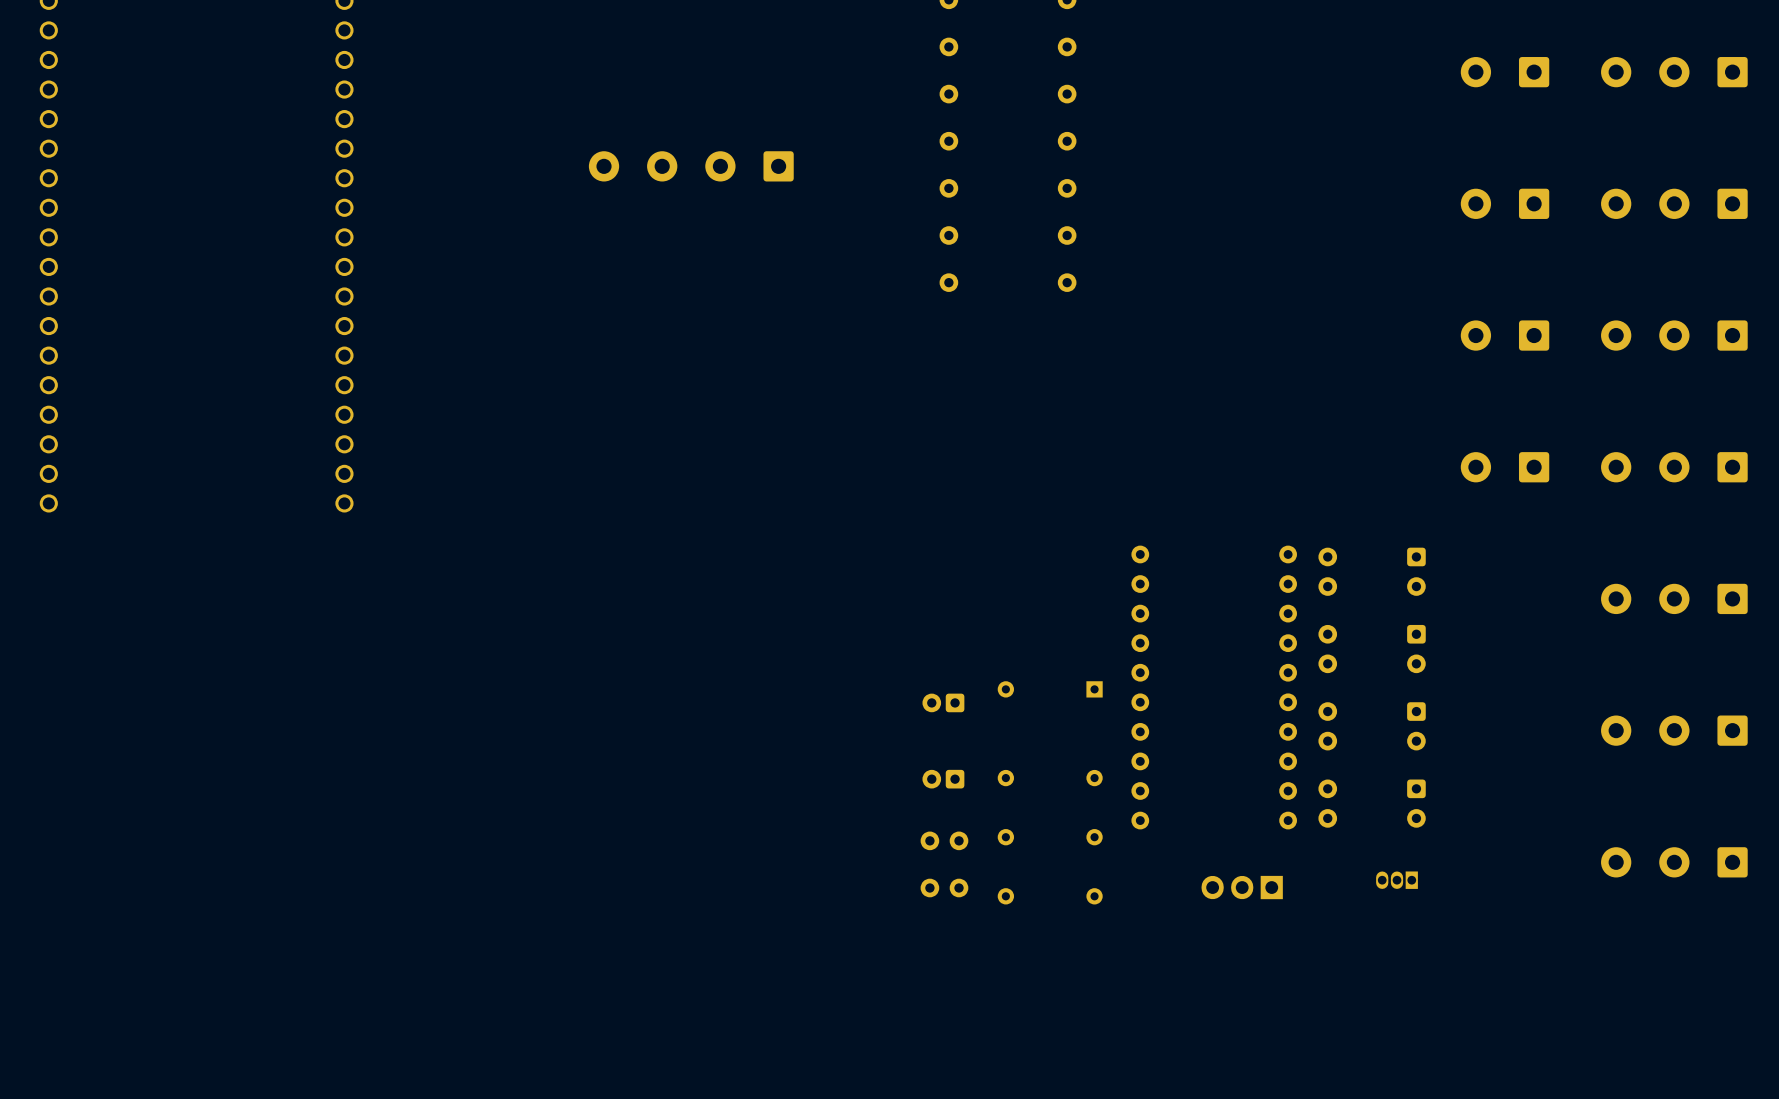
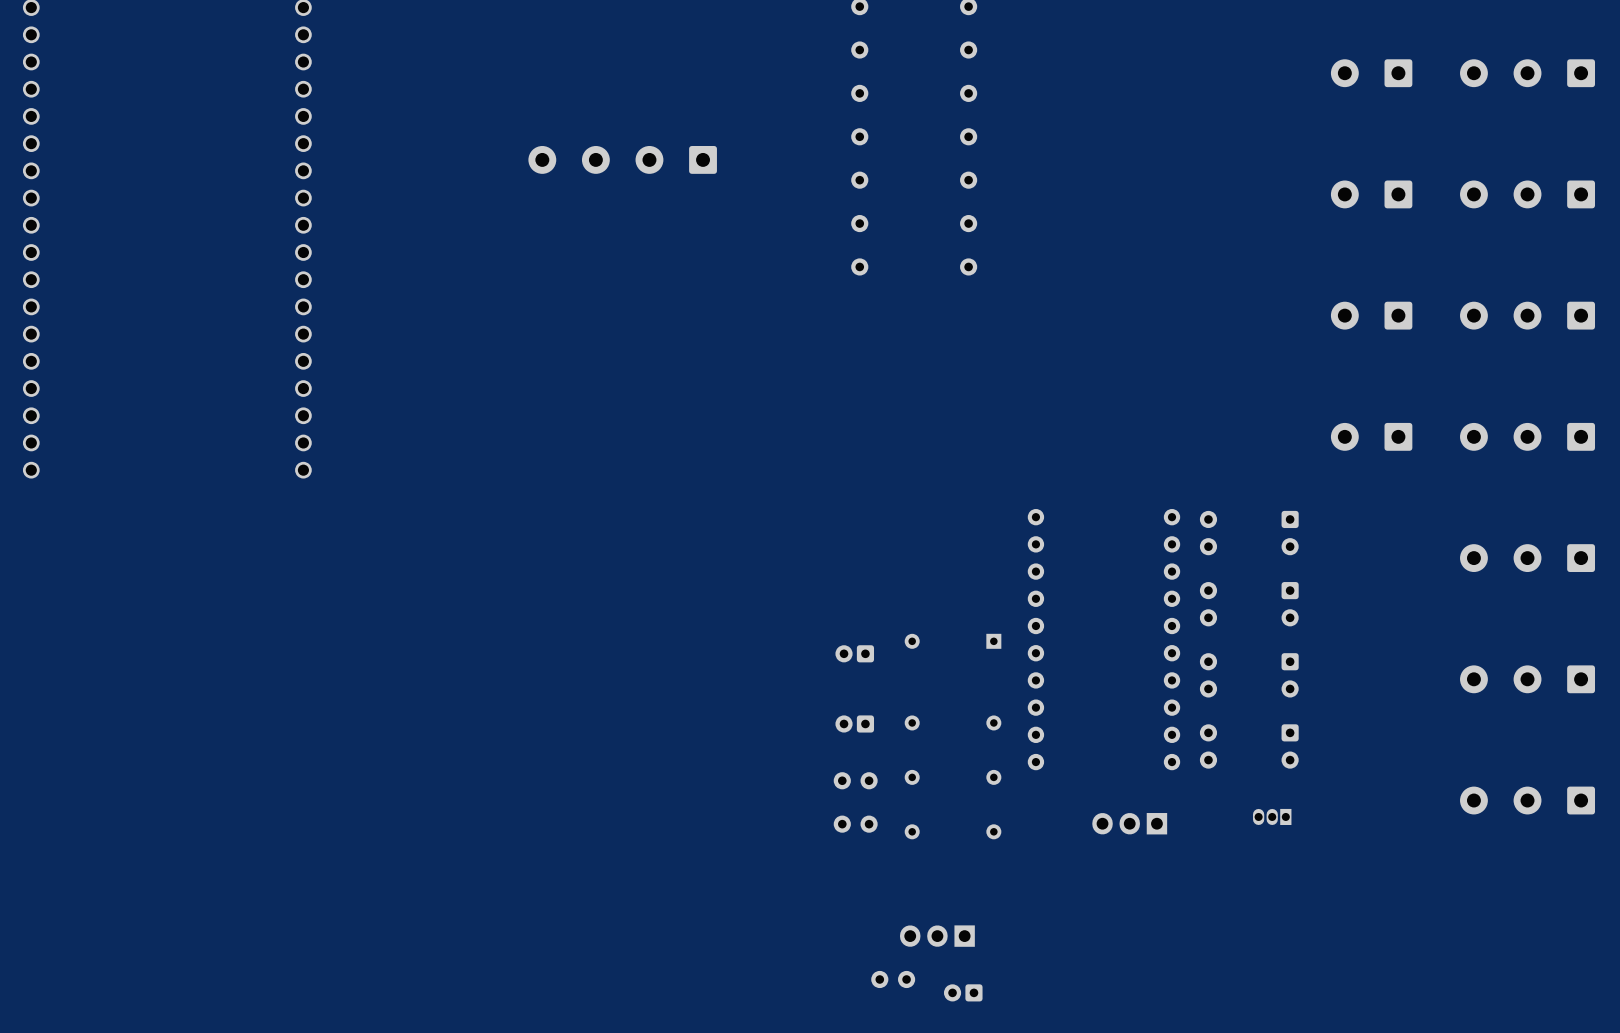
part: none -> (937, 936)
part: none -> (893, 979)
part: none -> (963, 992)

